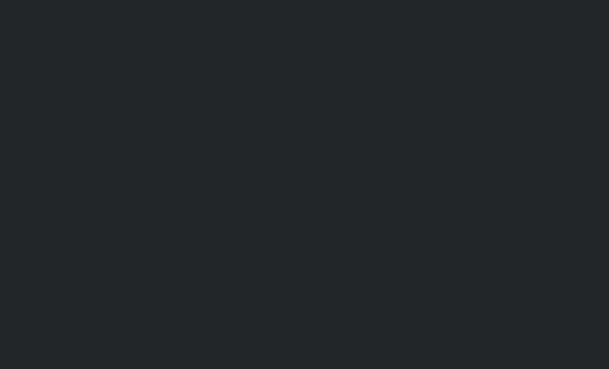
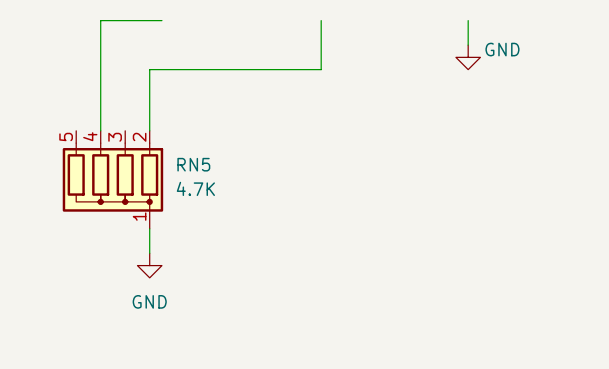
wire: none -> (161, 20) (100, 20) (100, 130)
wire: none -> (321, 20) (321, 69) (149, 69) (149, 130)
wire: none -> (468, 20) (468, 45)
power symbol: none -> GND (468, 57)
RN5: none -> 4.7K (112, 179)
wire: none -> (149, 228) (149, 253)
power symbol: none -> GND (149, 265)

